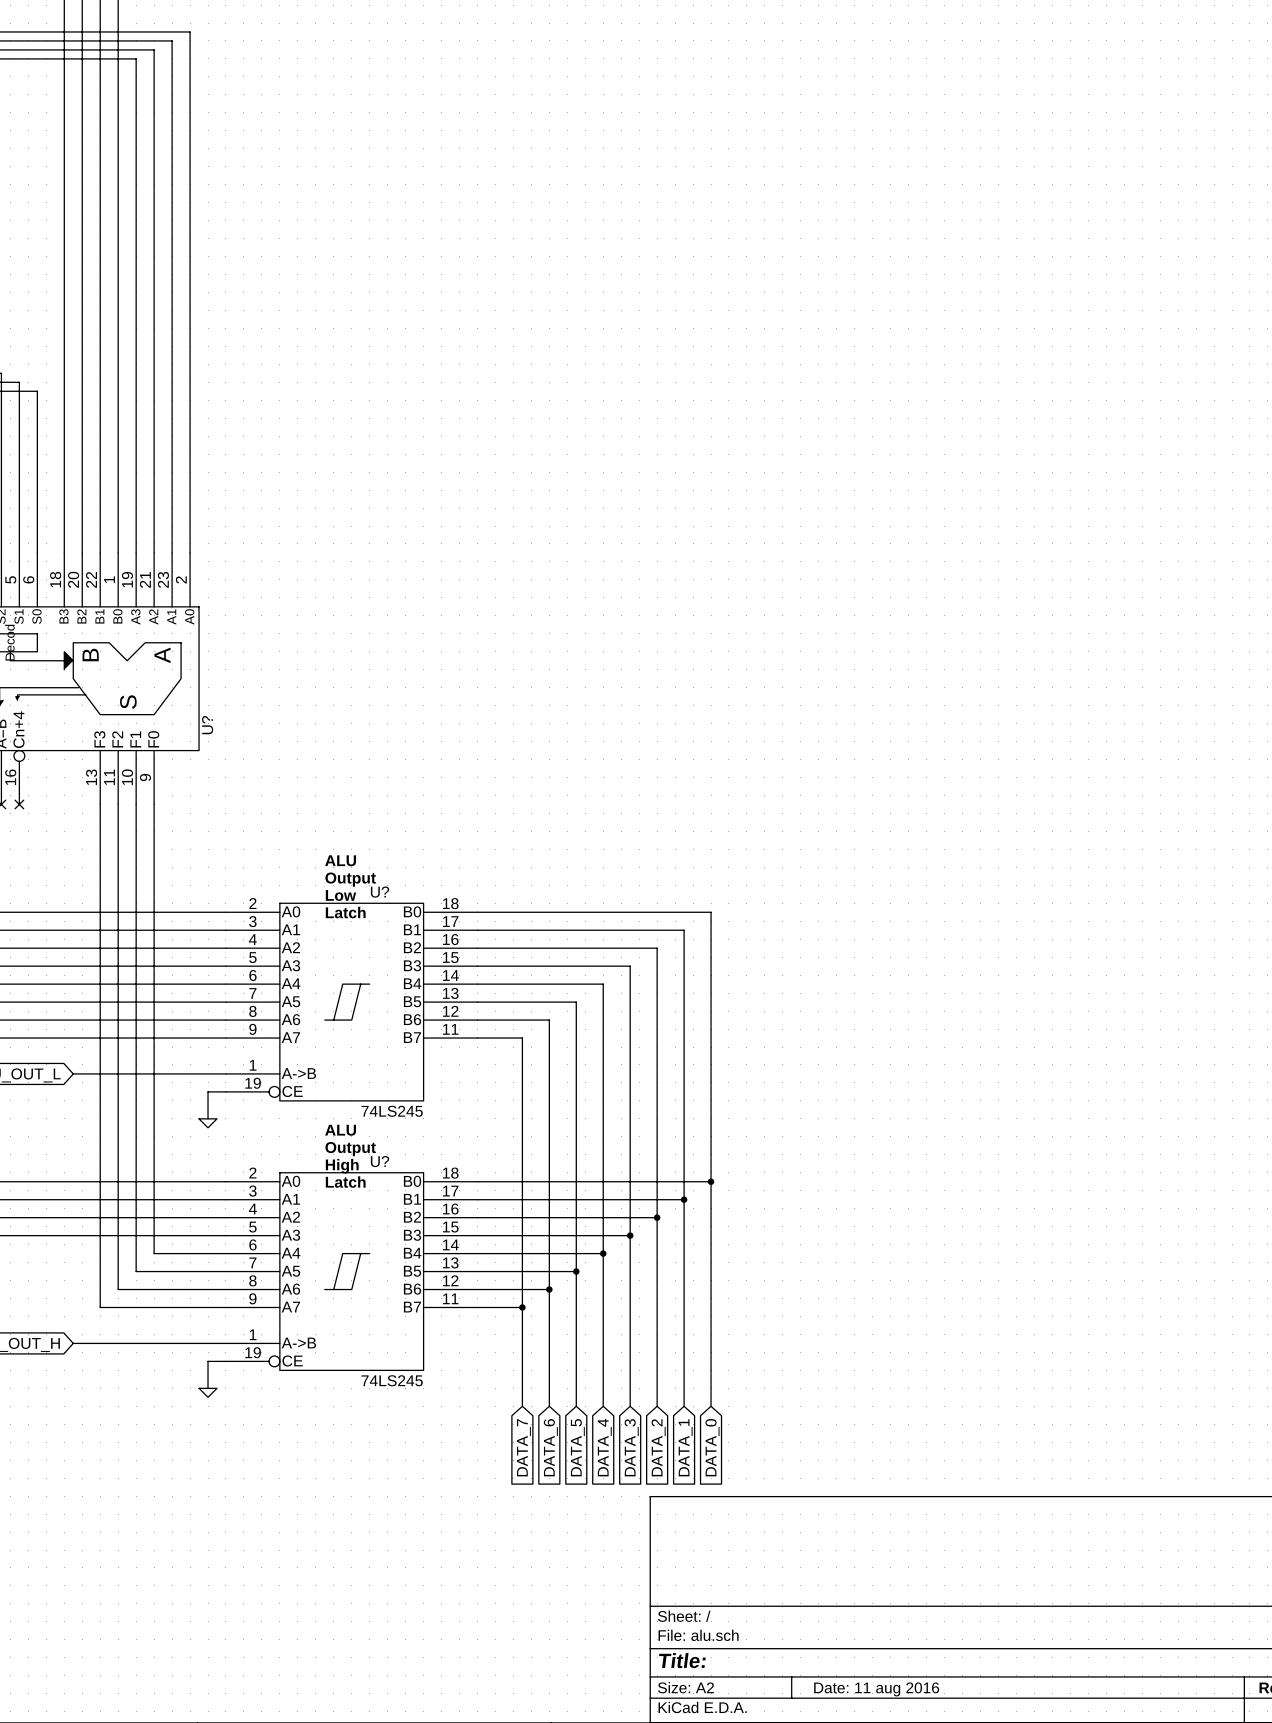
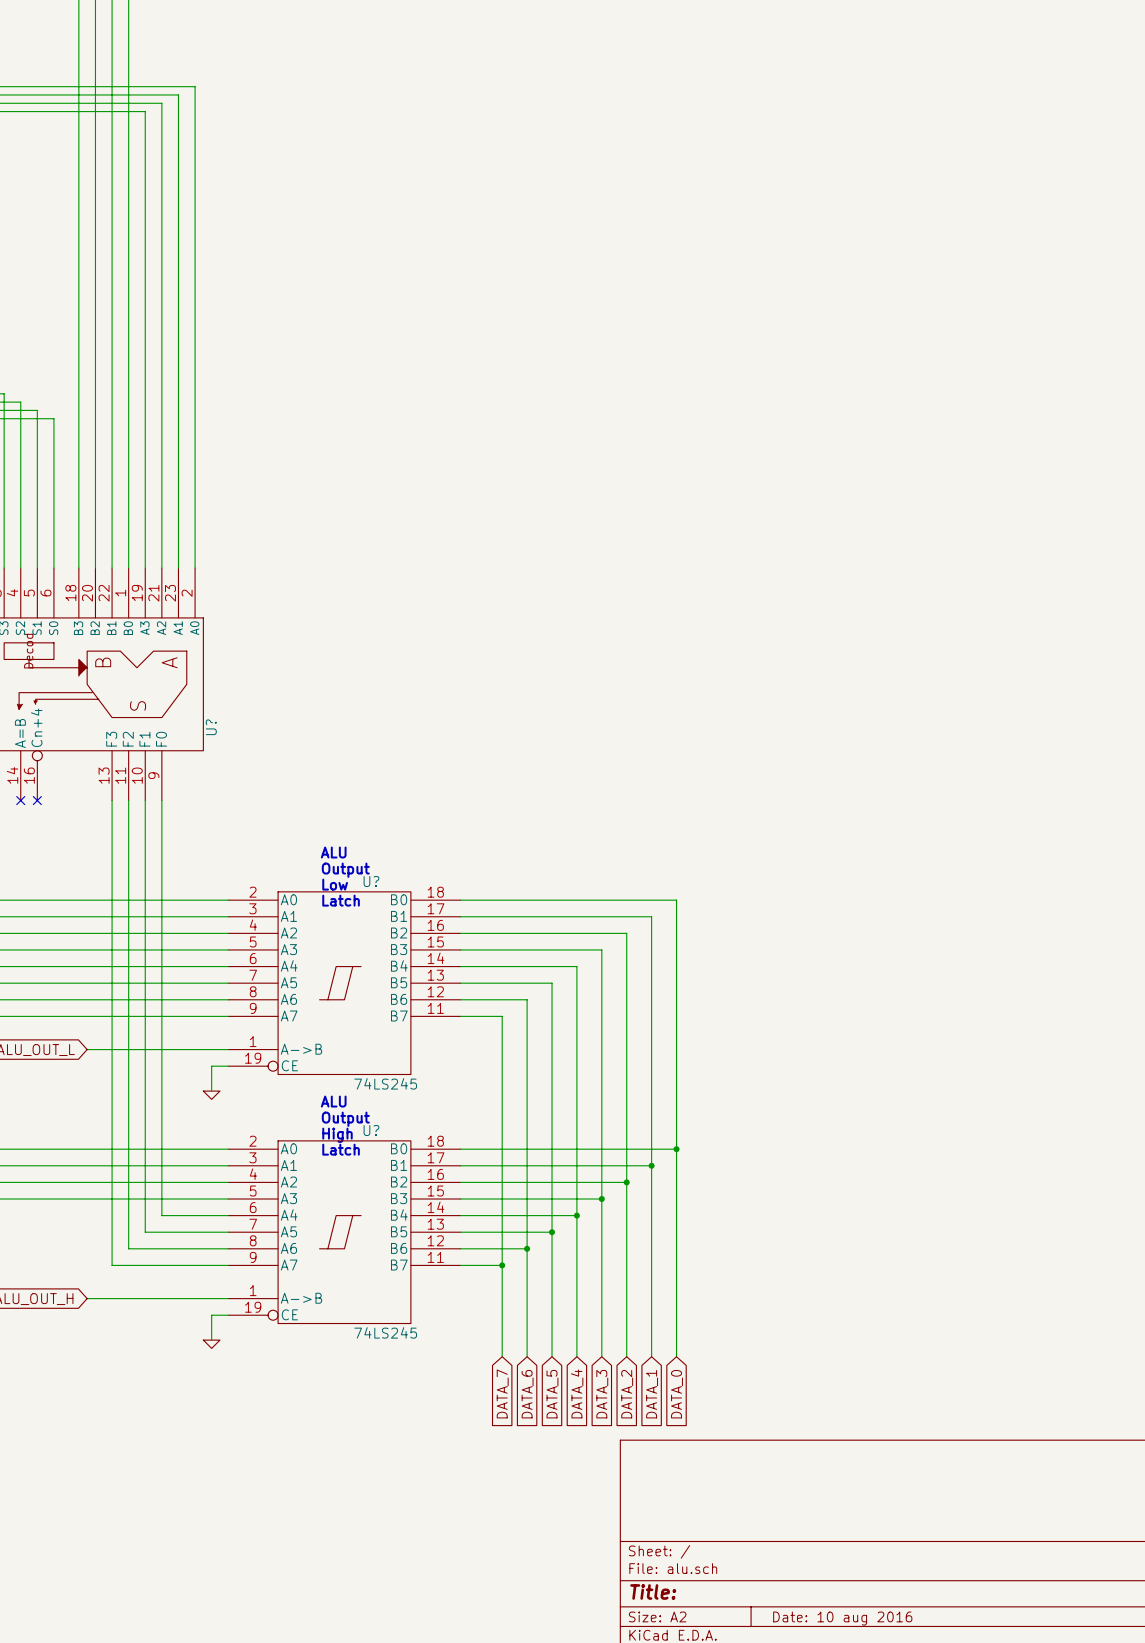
title block: Date: 11 aug 2016 (876, 1689) -> Date: 10 aug 2016 (842, 1618)

